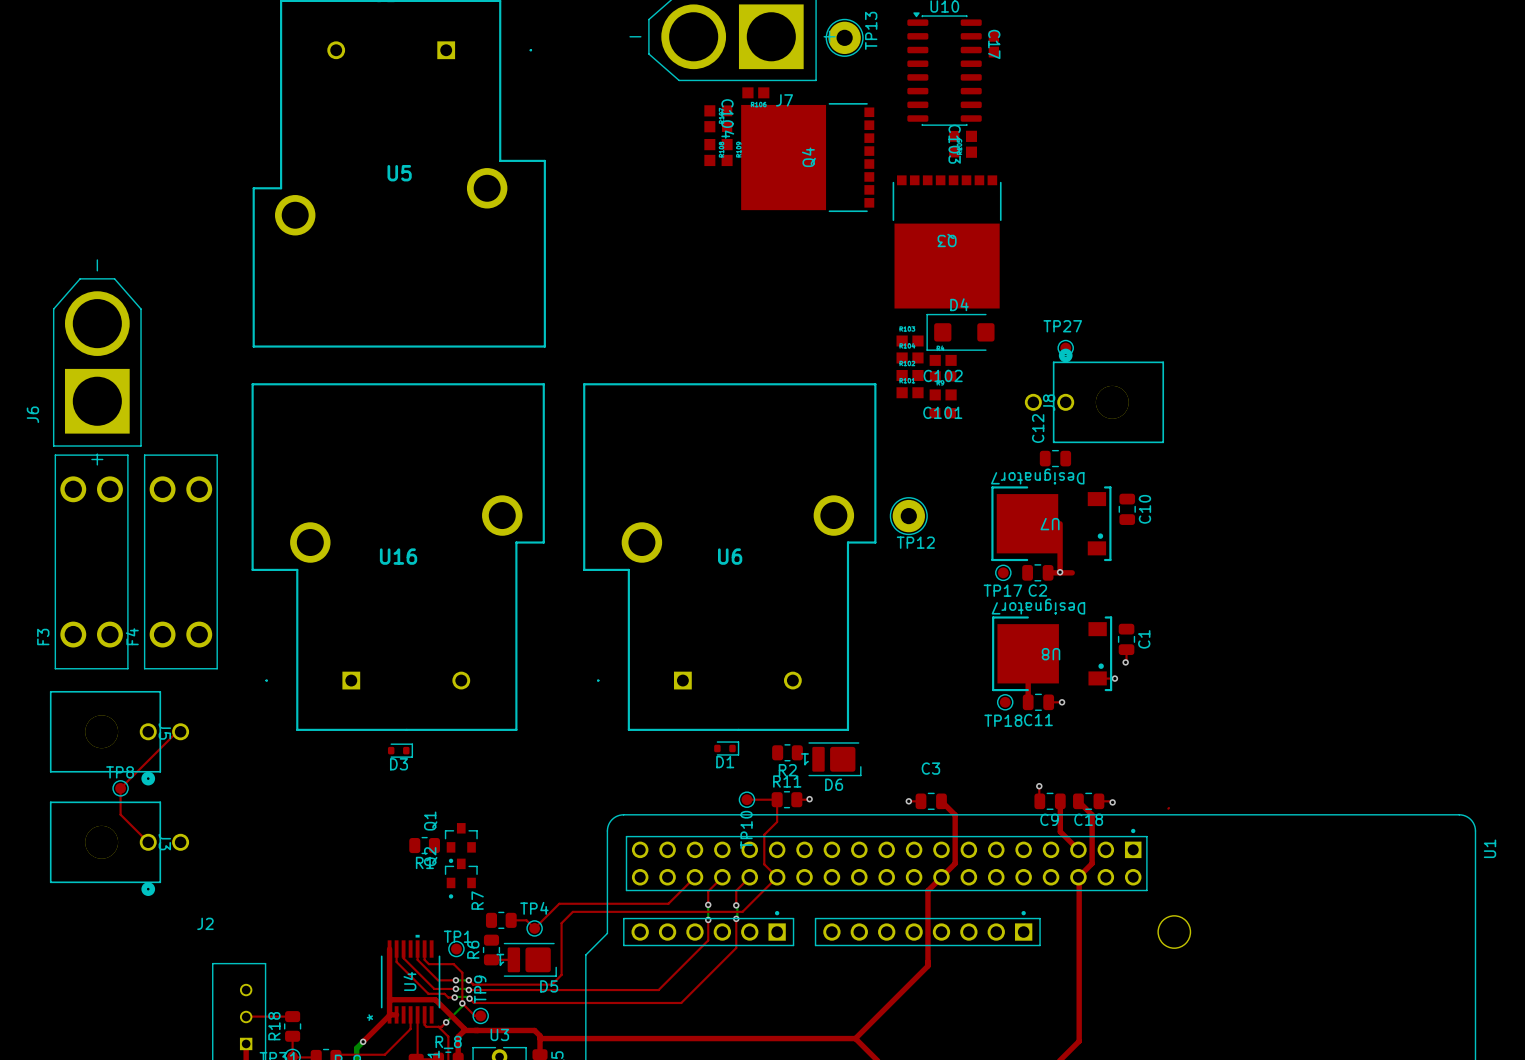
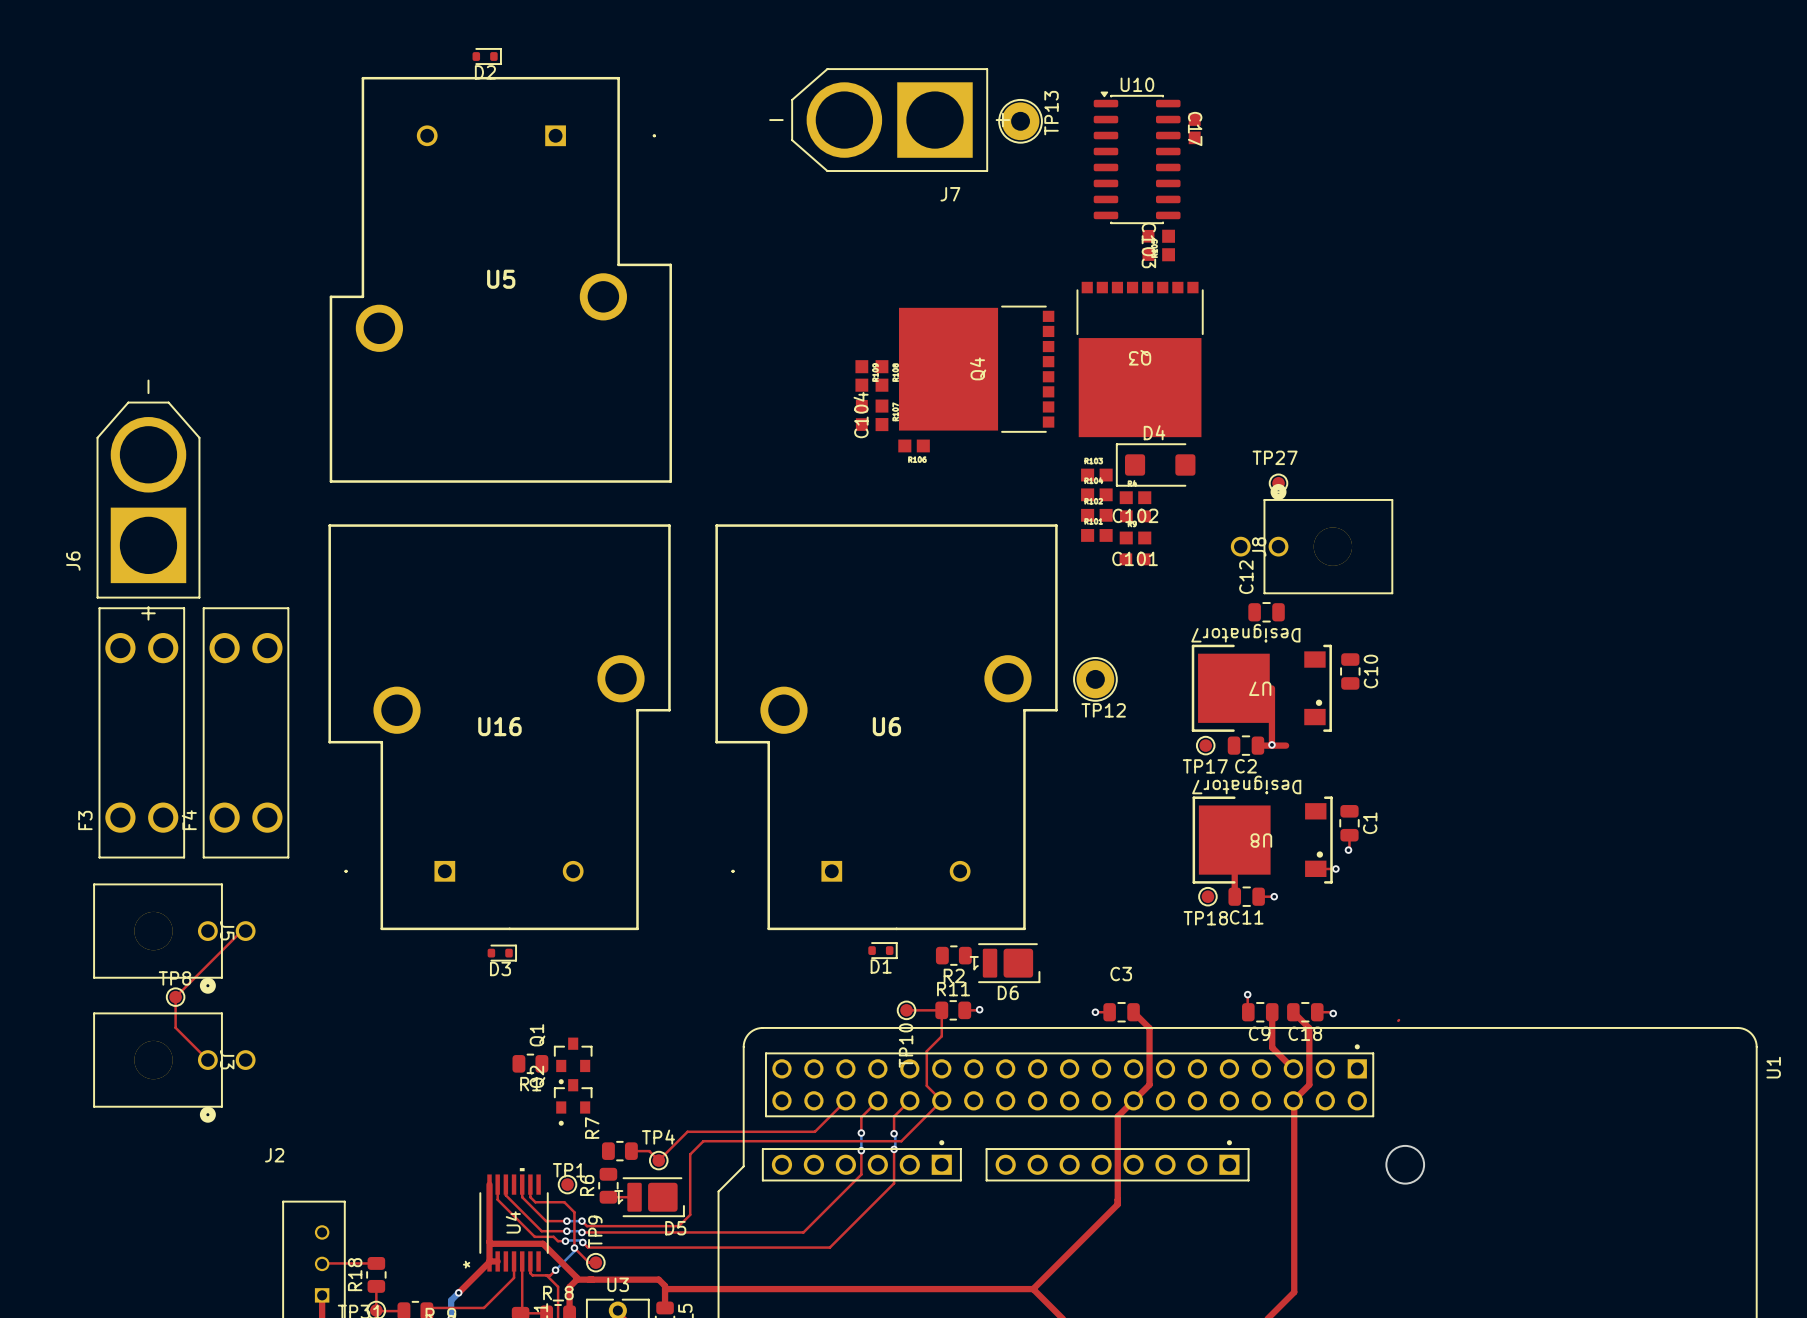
part position: (755, 92) -> (914, 445)
part position: (709, 118) -> (881, 415)
C104 position: (727, 118) -> (861, 415)
C104 name rotation: 0° (727, 118) -> 180° (861, 415)
part position: (709, 152) -> (881, 375)
part position: (727, 152) -> (861, 375)
Q4 position: (807, 157) -> (976, 369)

